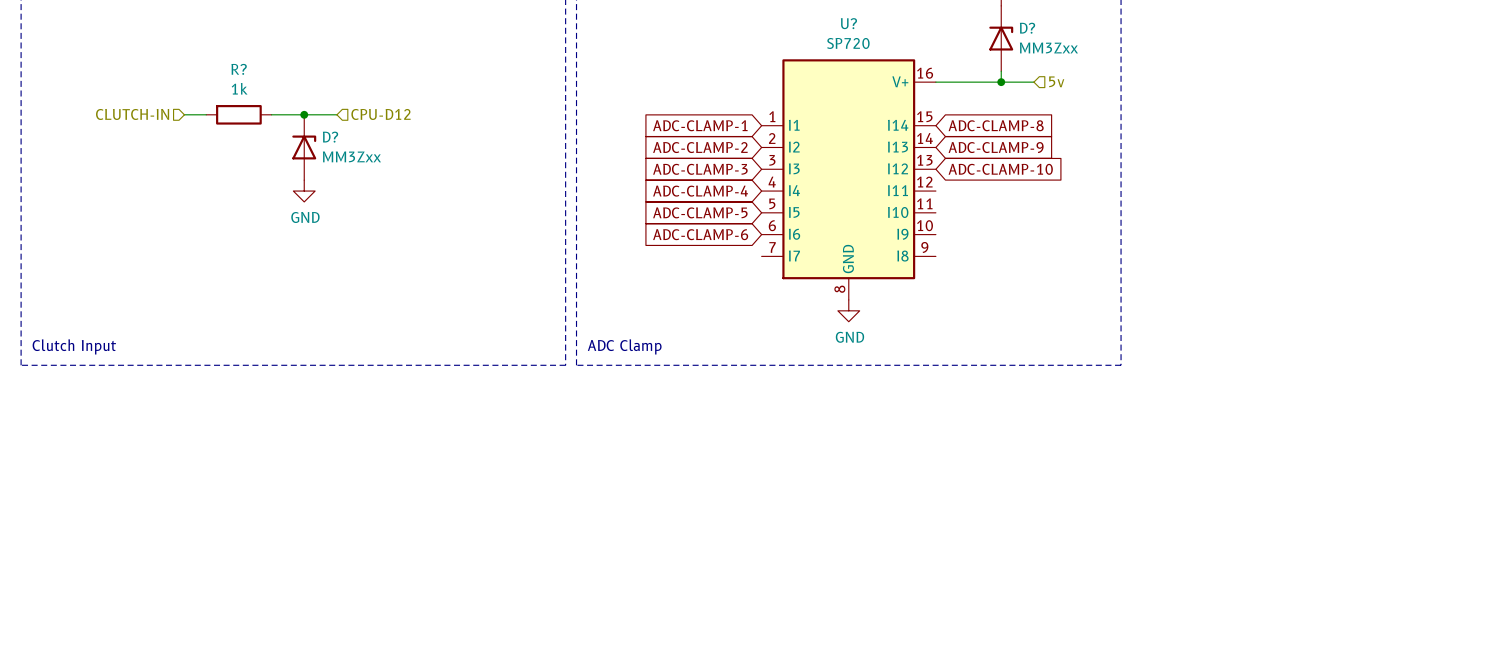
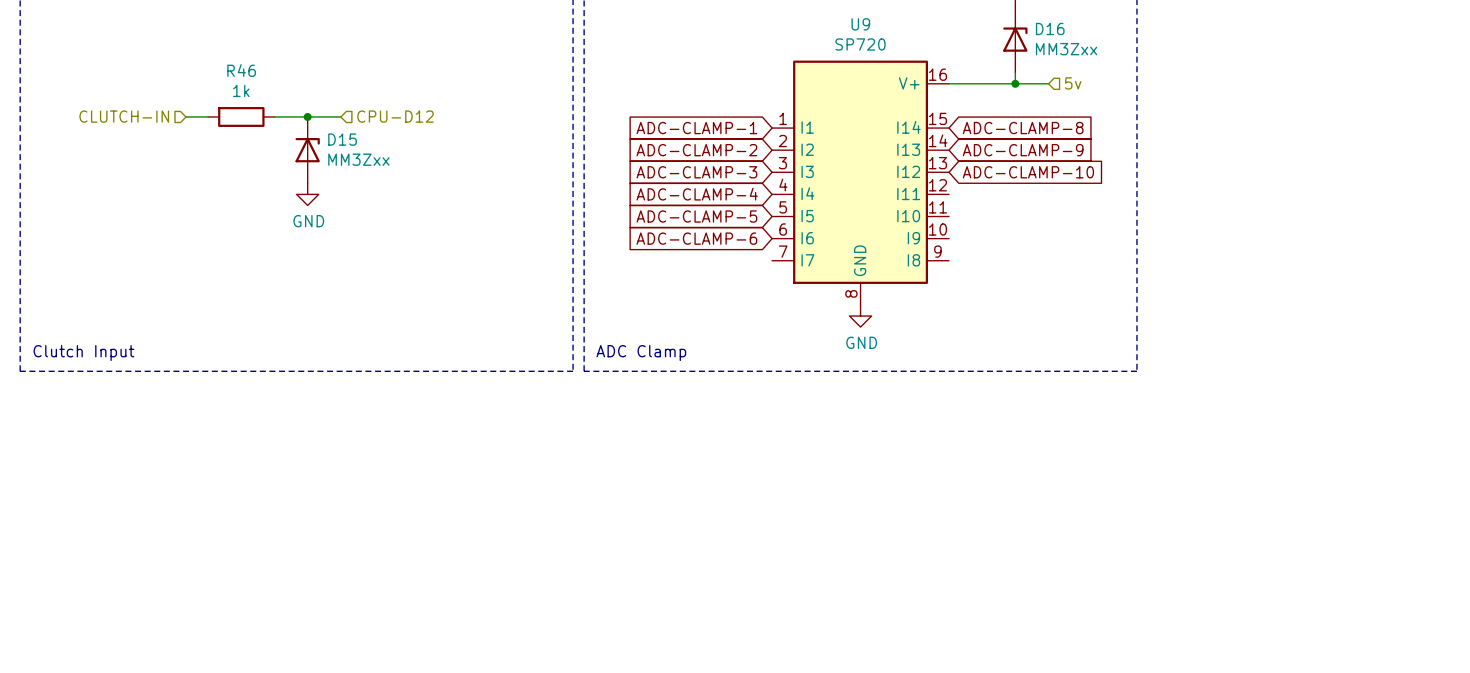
U? name: U? (848, 23) -> U9 (860, 24)
D? name: D? (1027, 28) -> D16 (1050, 29)
R? name: R? (239, 69) -> R46 (241, 70)
D? name: D? (330, 137) -> D15 (342, 139)

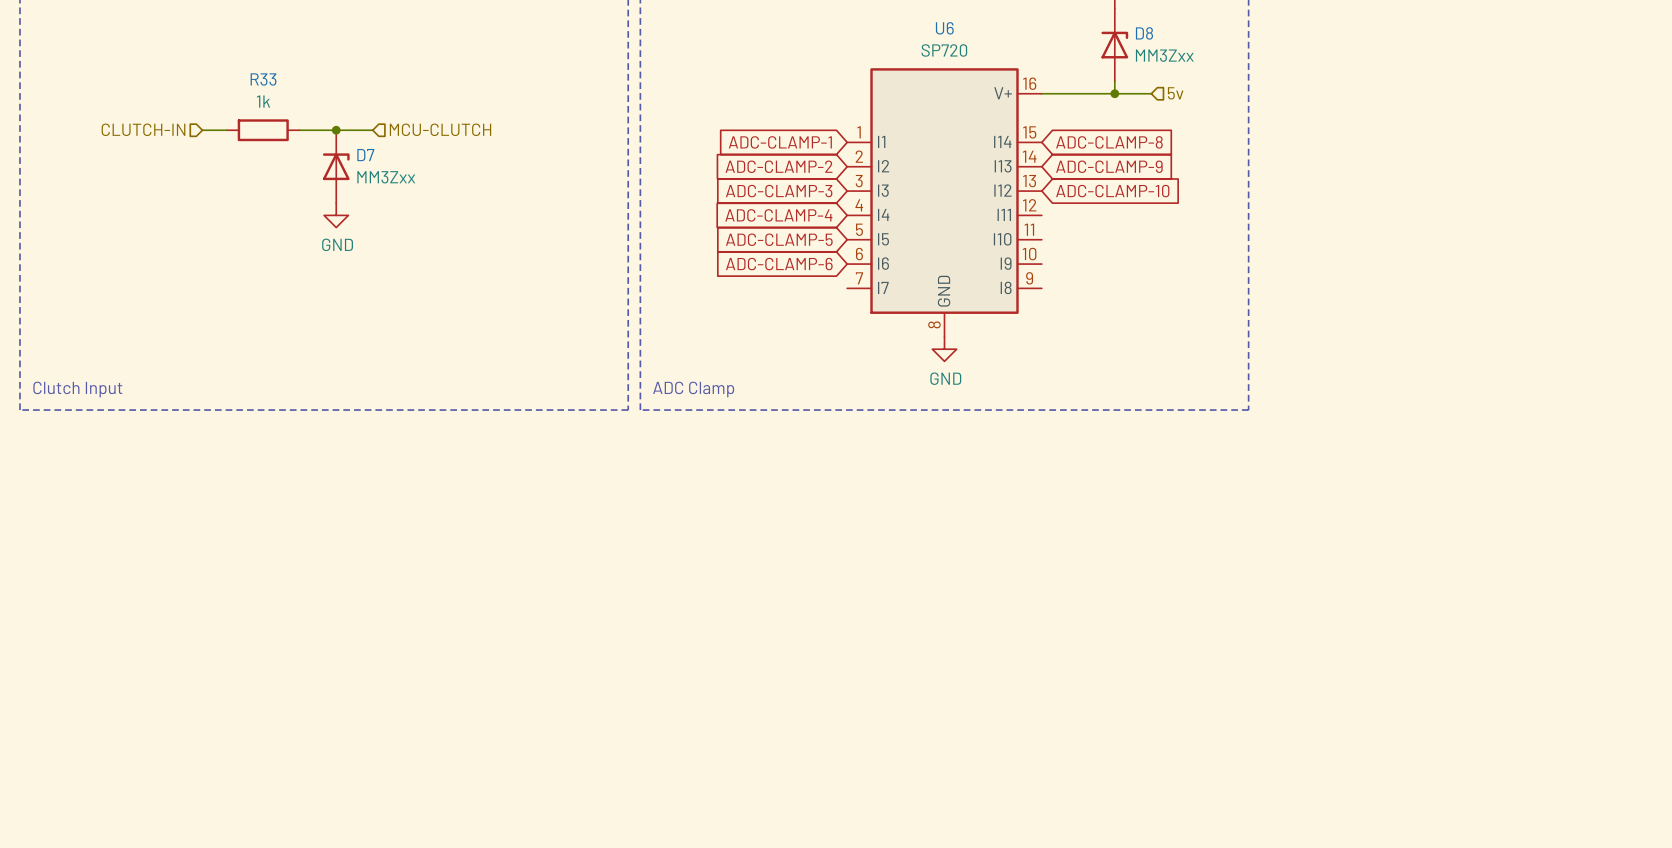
U9 name: U9 (860, 24) -> U6 (944, 28)
D16 name: D16 (1050, 29) -> D8 (1144, 33)
R46 name: R46 (241, 70) -> R33 (263, 79)
hierarchical label: CPU-D12 (395, 116) -> MCU-CLUTCH (440, 129)
D15 name: D15 (342, 139) -> D7 (365, 155)

